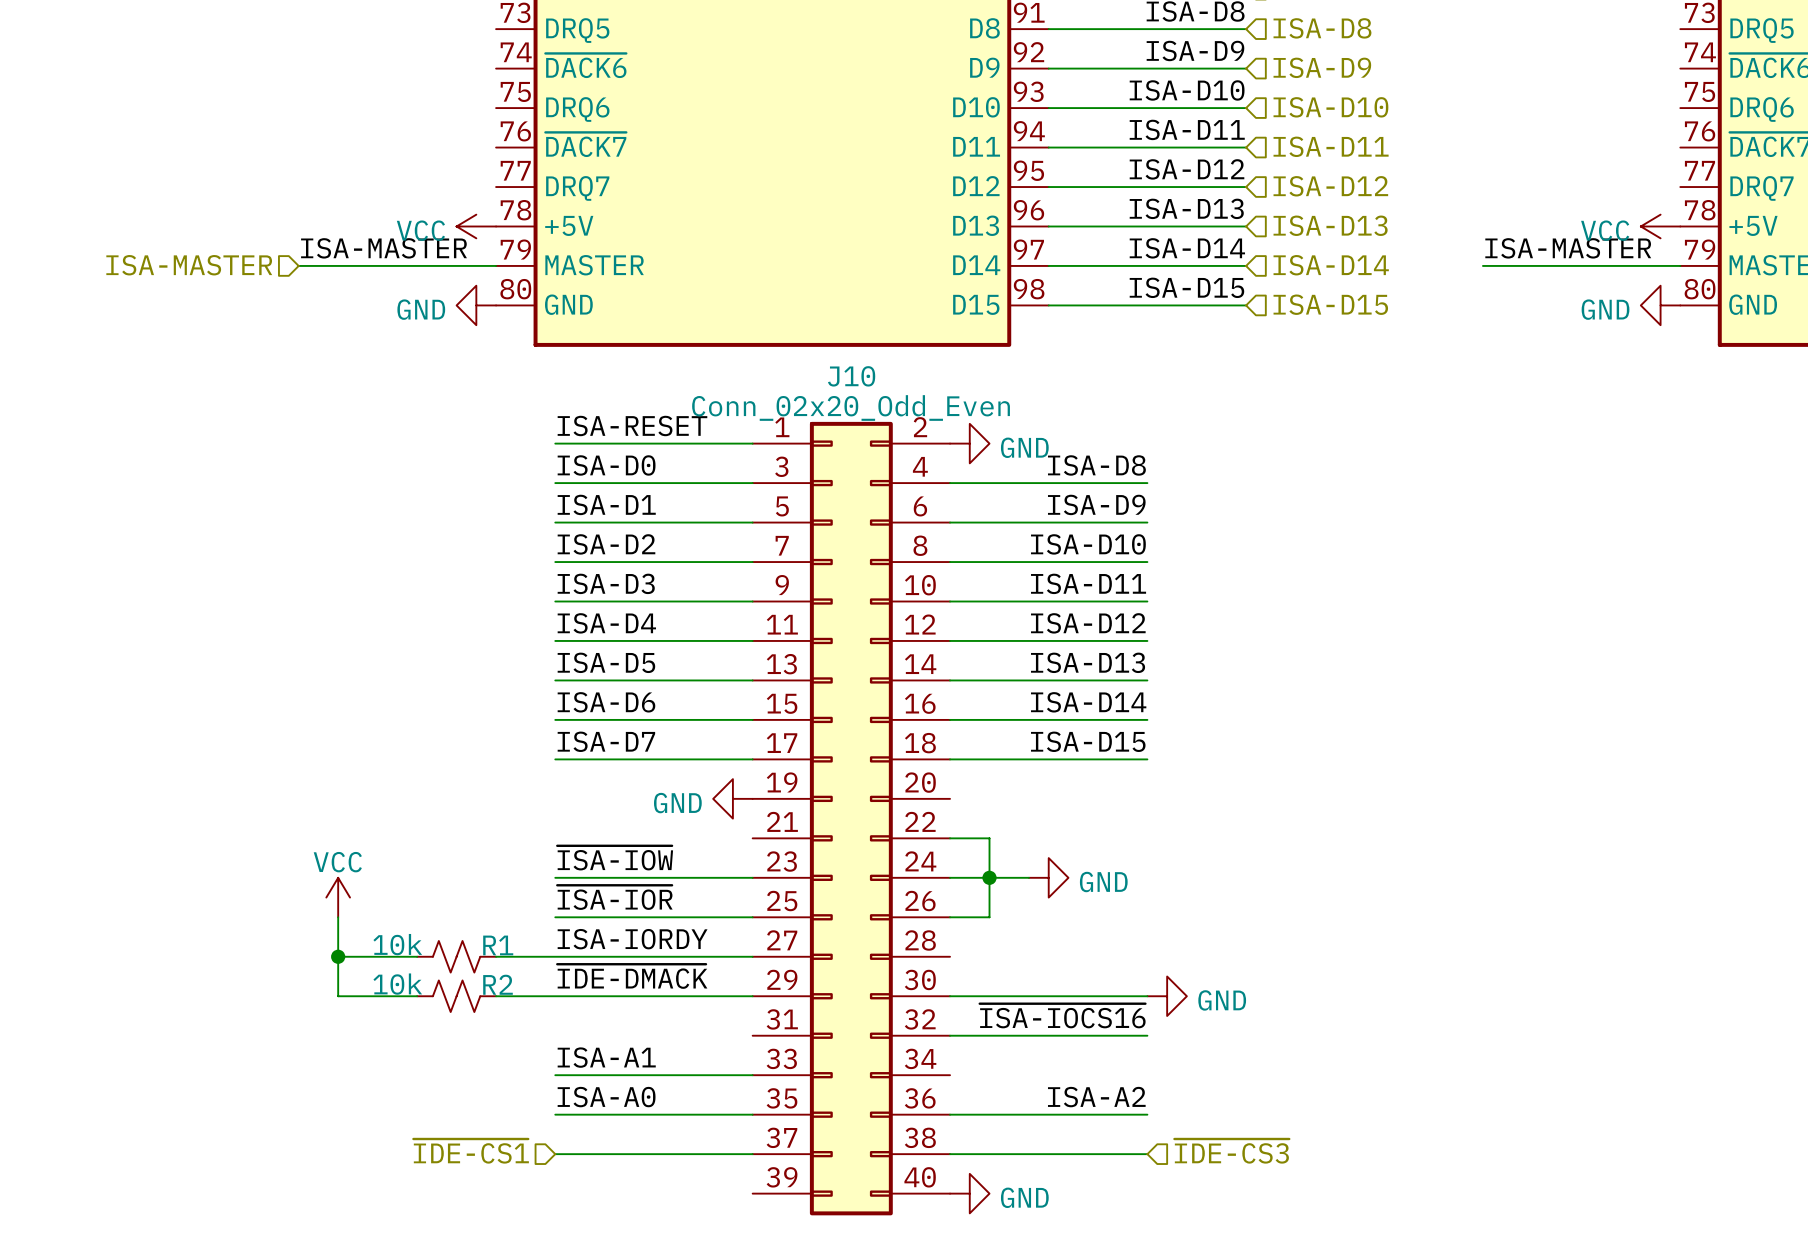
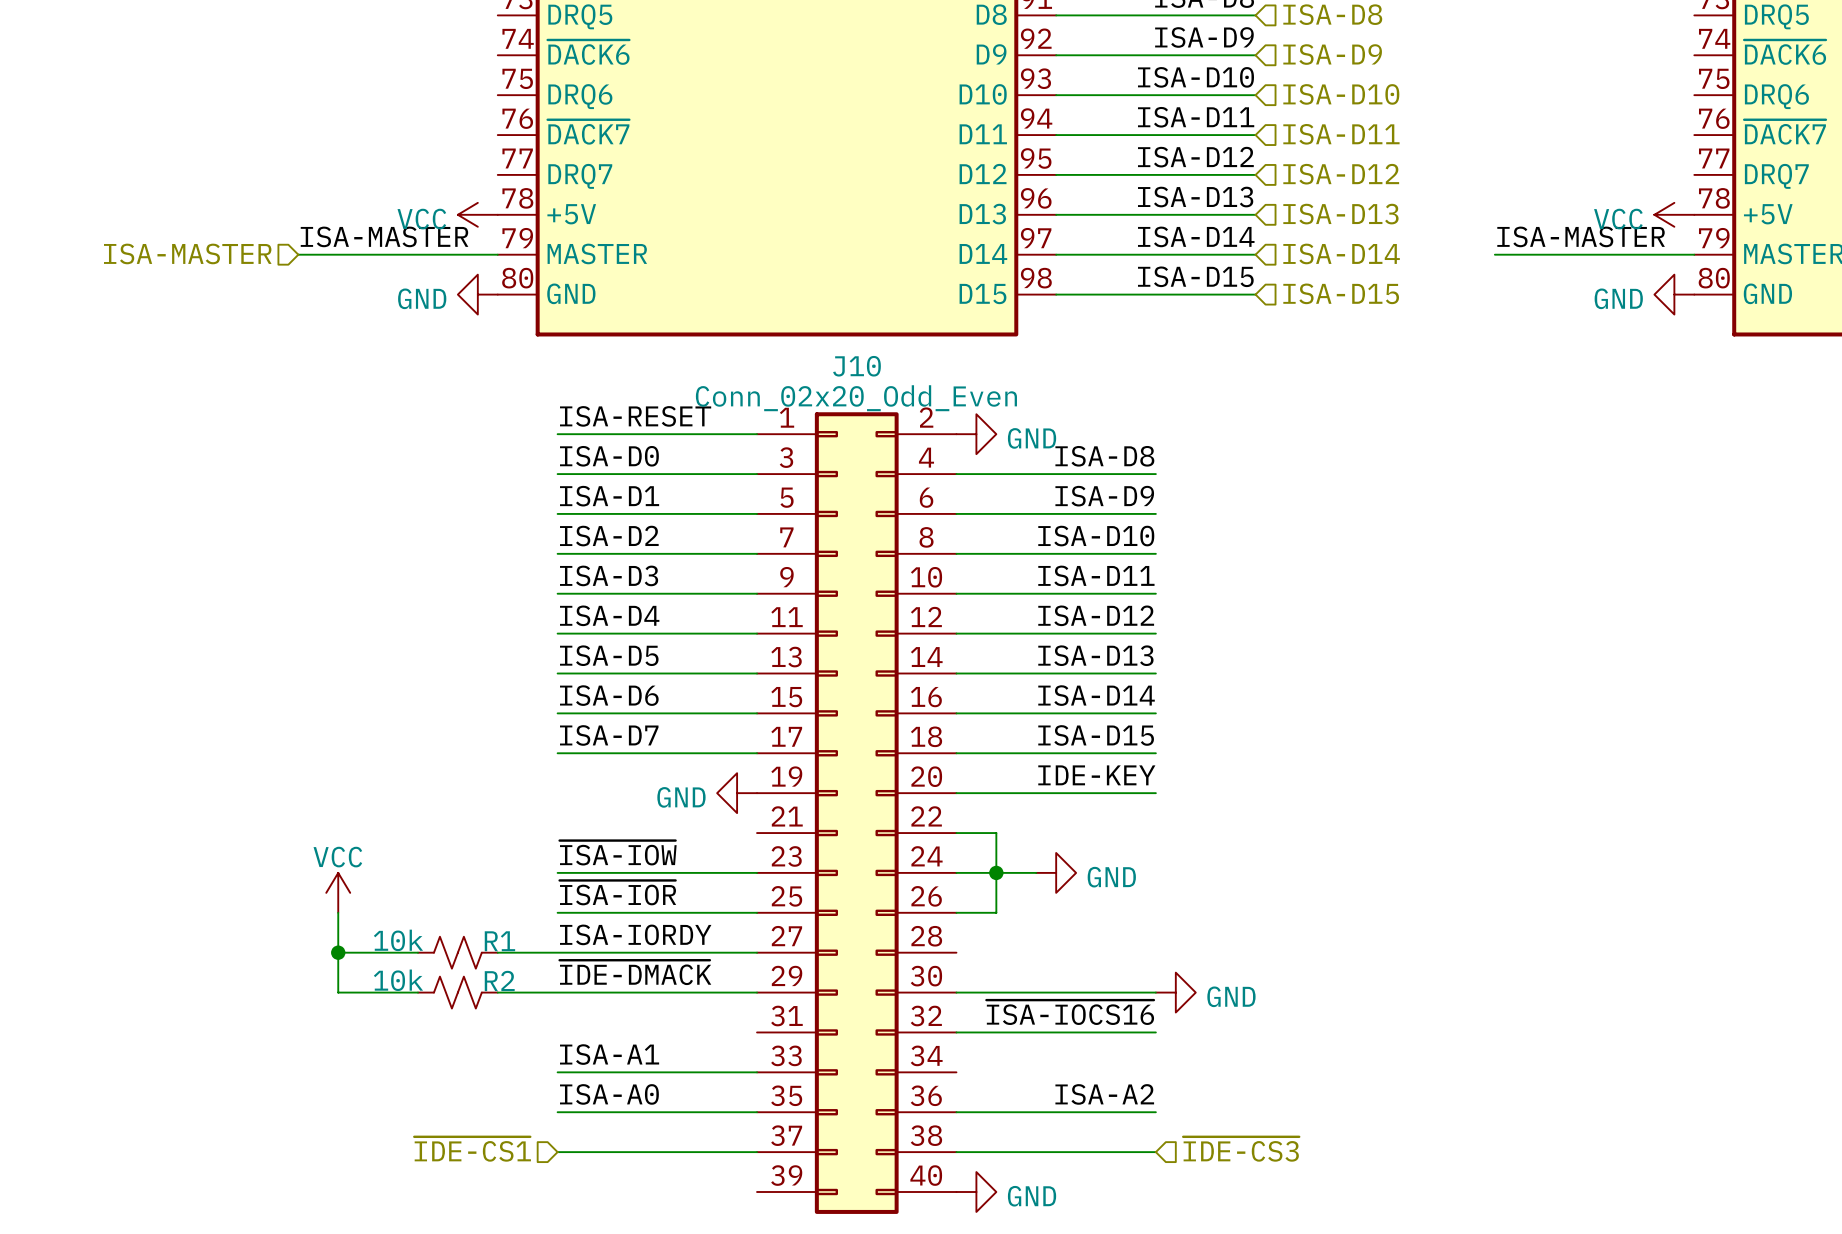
label: none -> IDE-KEY (1096, 775)
wire: none -> (956, 793) (1155, 793)

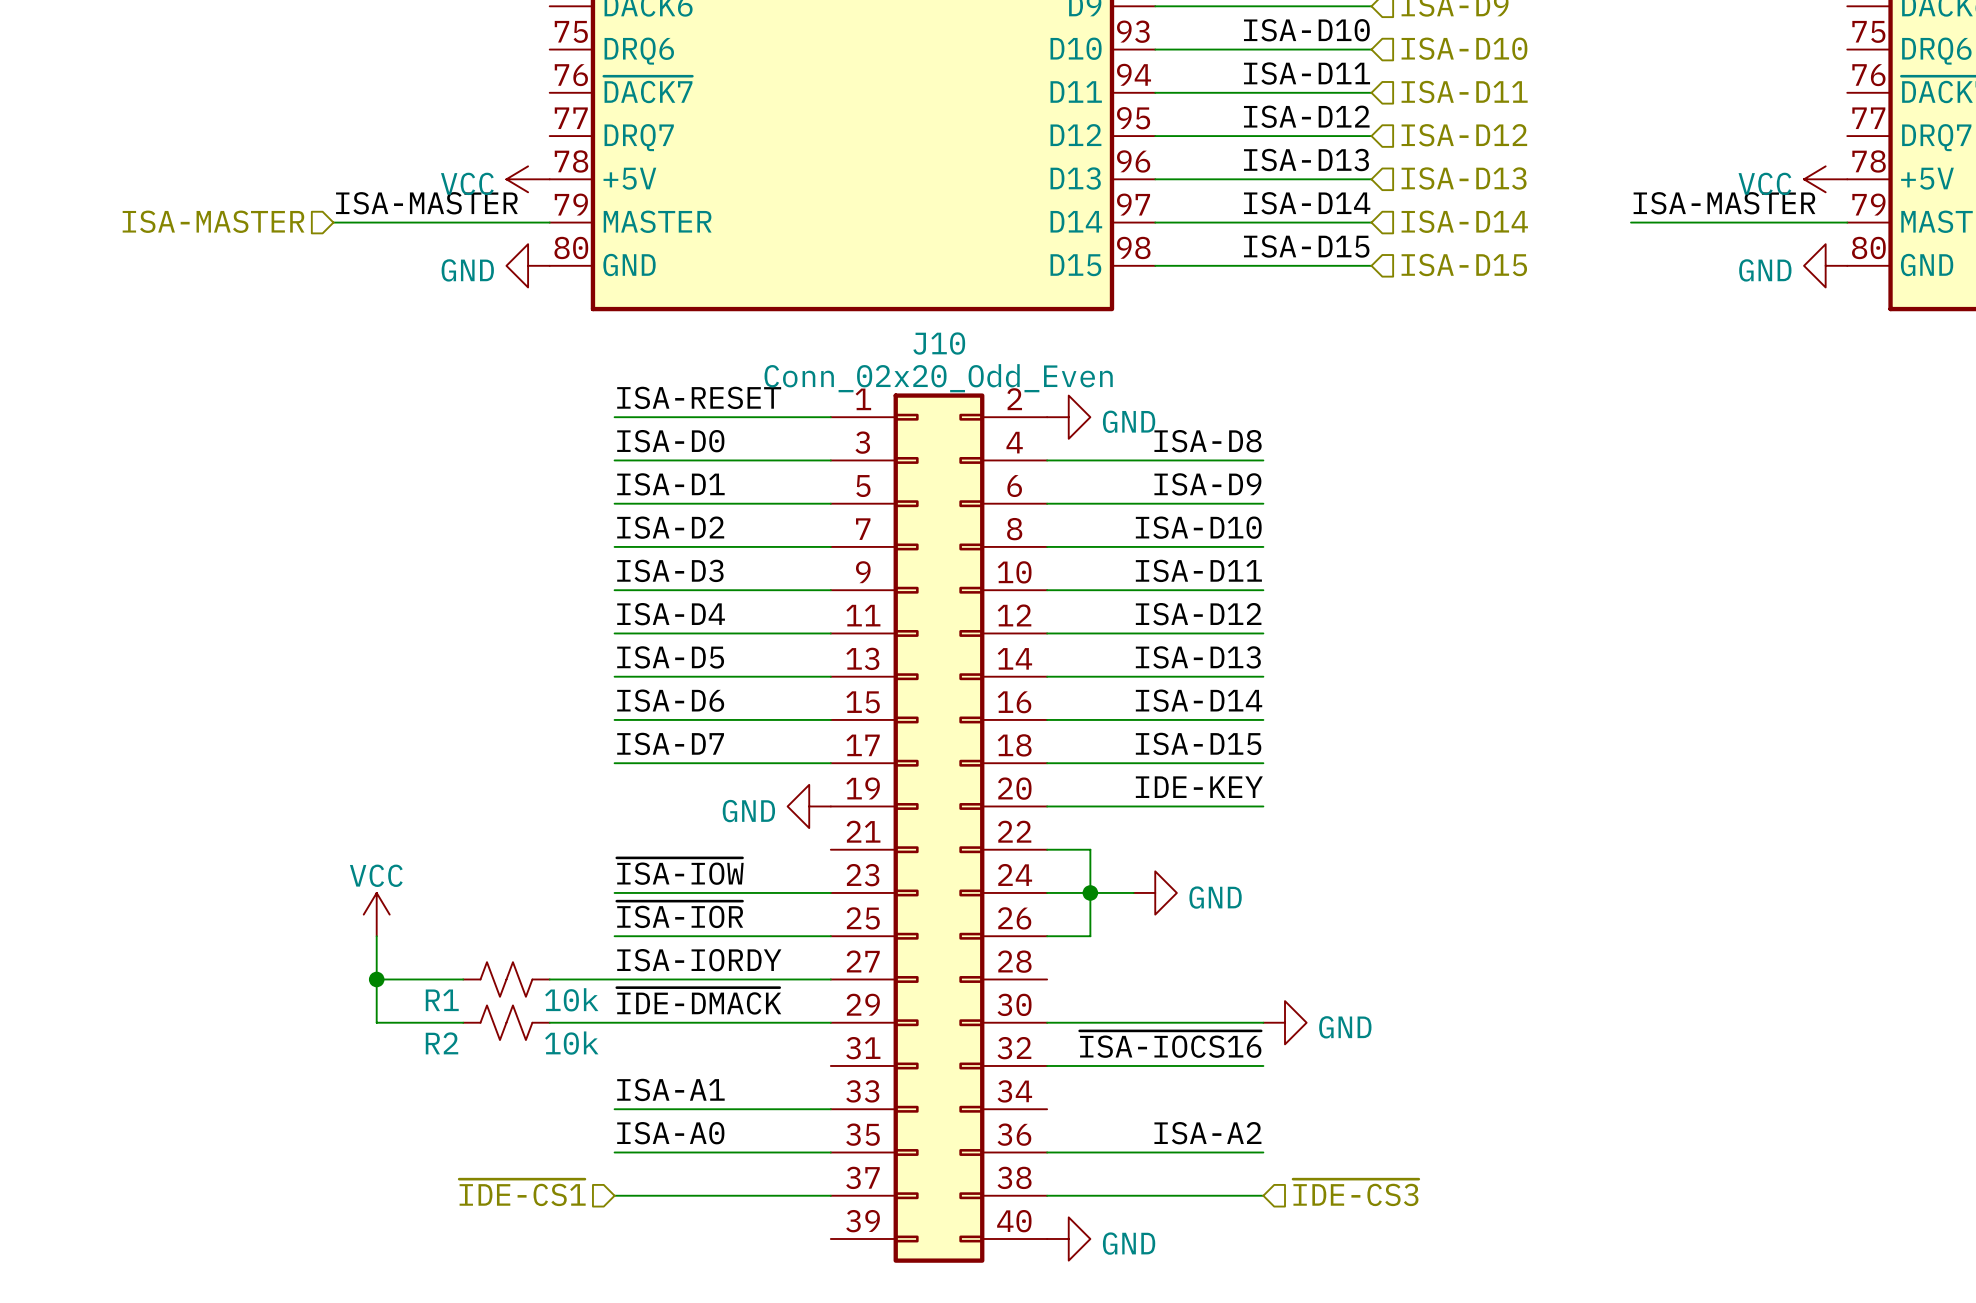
R1 value position: 10k (398, 940) -> 10k (571, 999)
R1 name position: R1 (499, 941) -> R1 (442, 1000)
R2 value position: 10k (398, 980) -> 10k (571, 1043)
R2 name position: R2 (499, 980) -> R2 (442, 1043)

